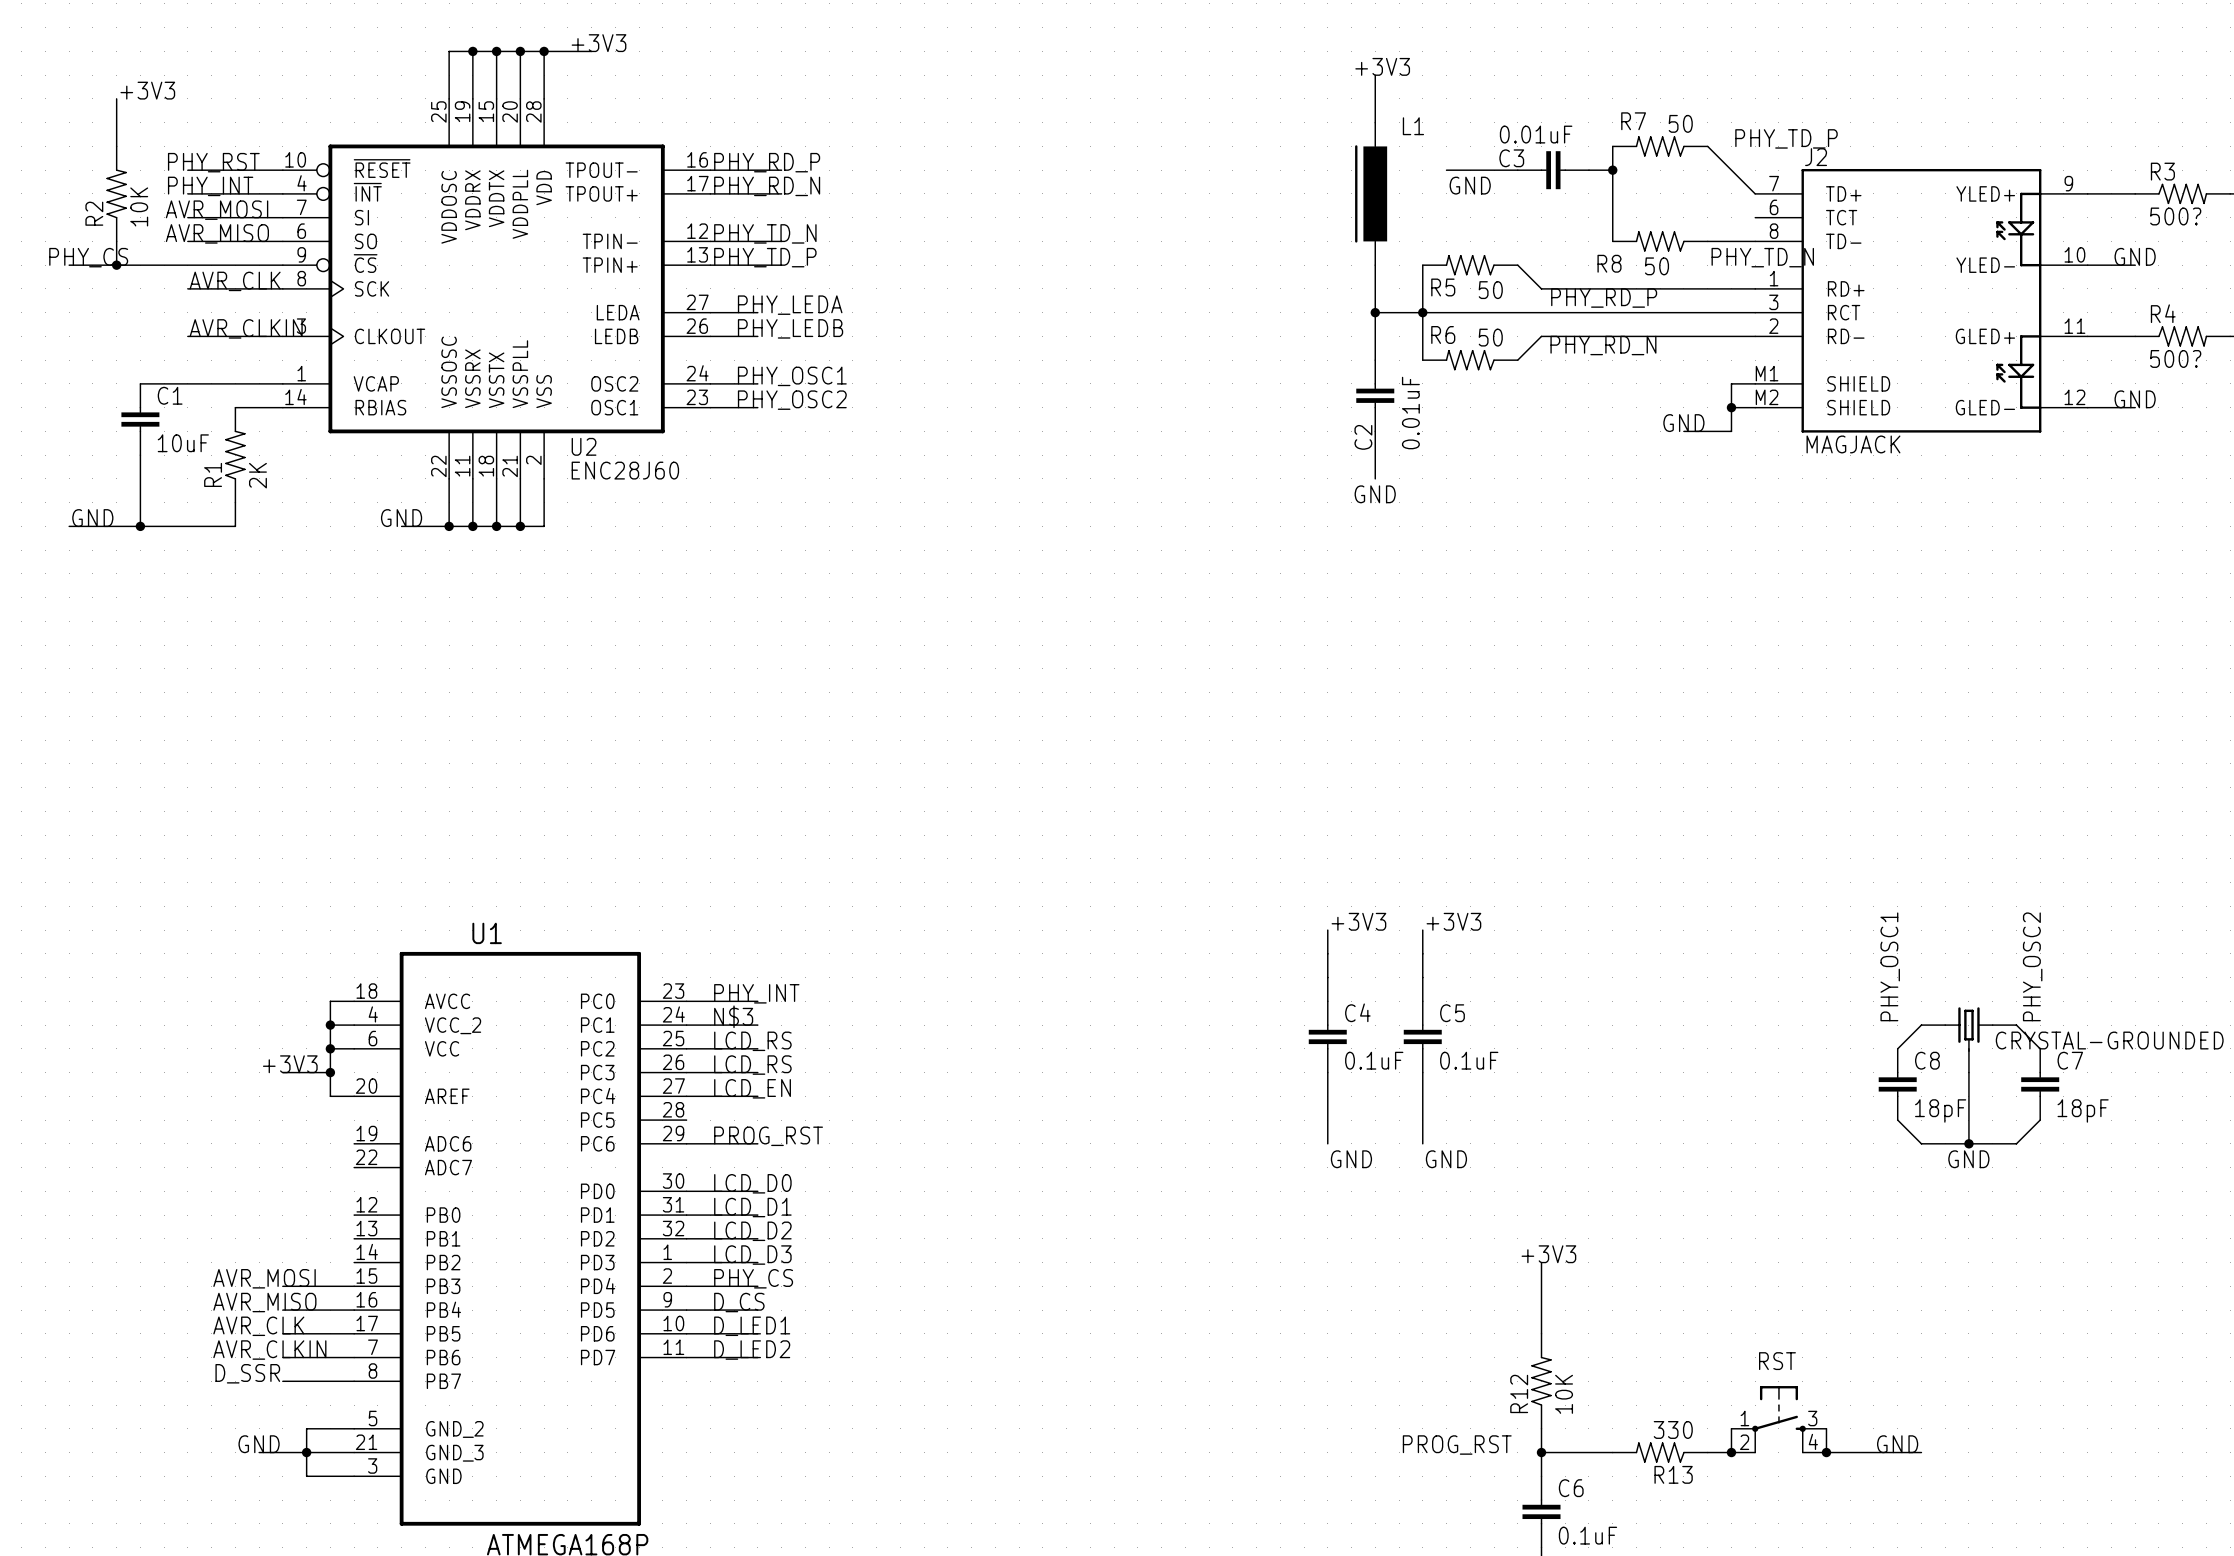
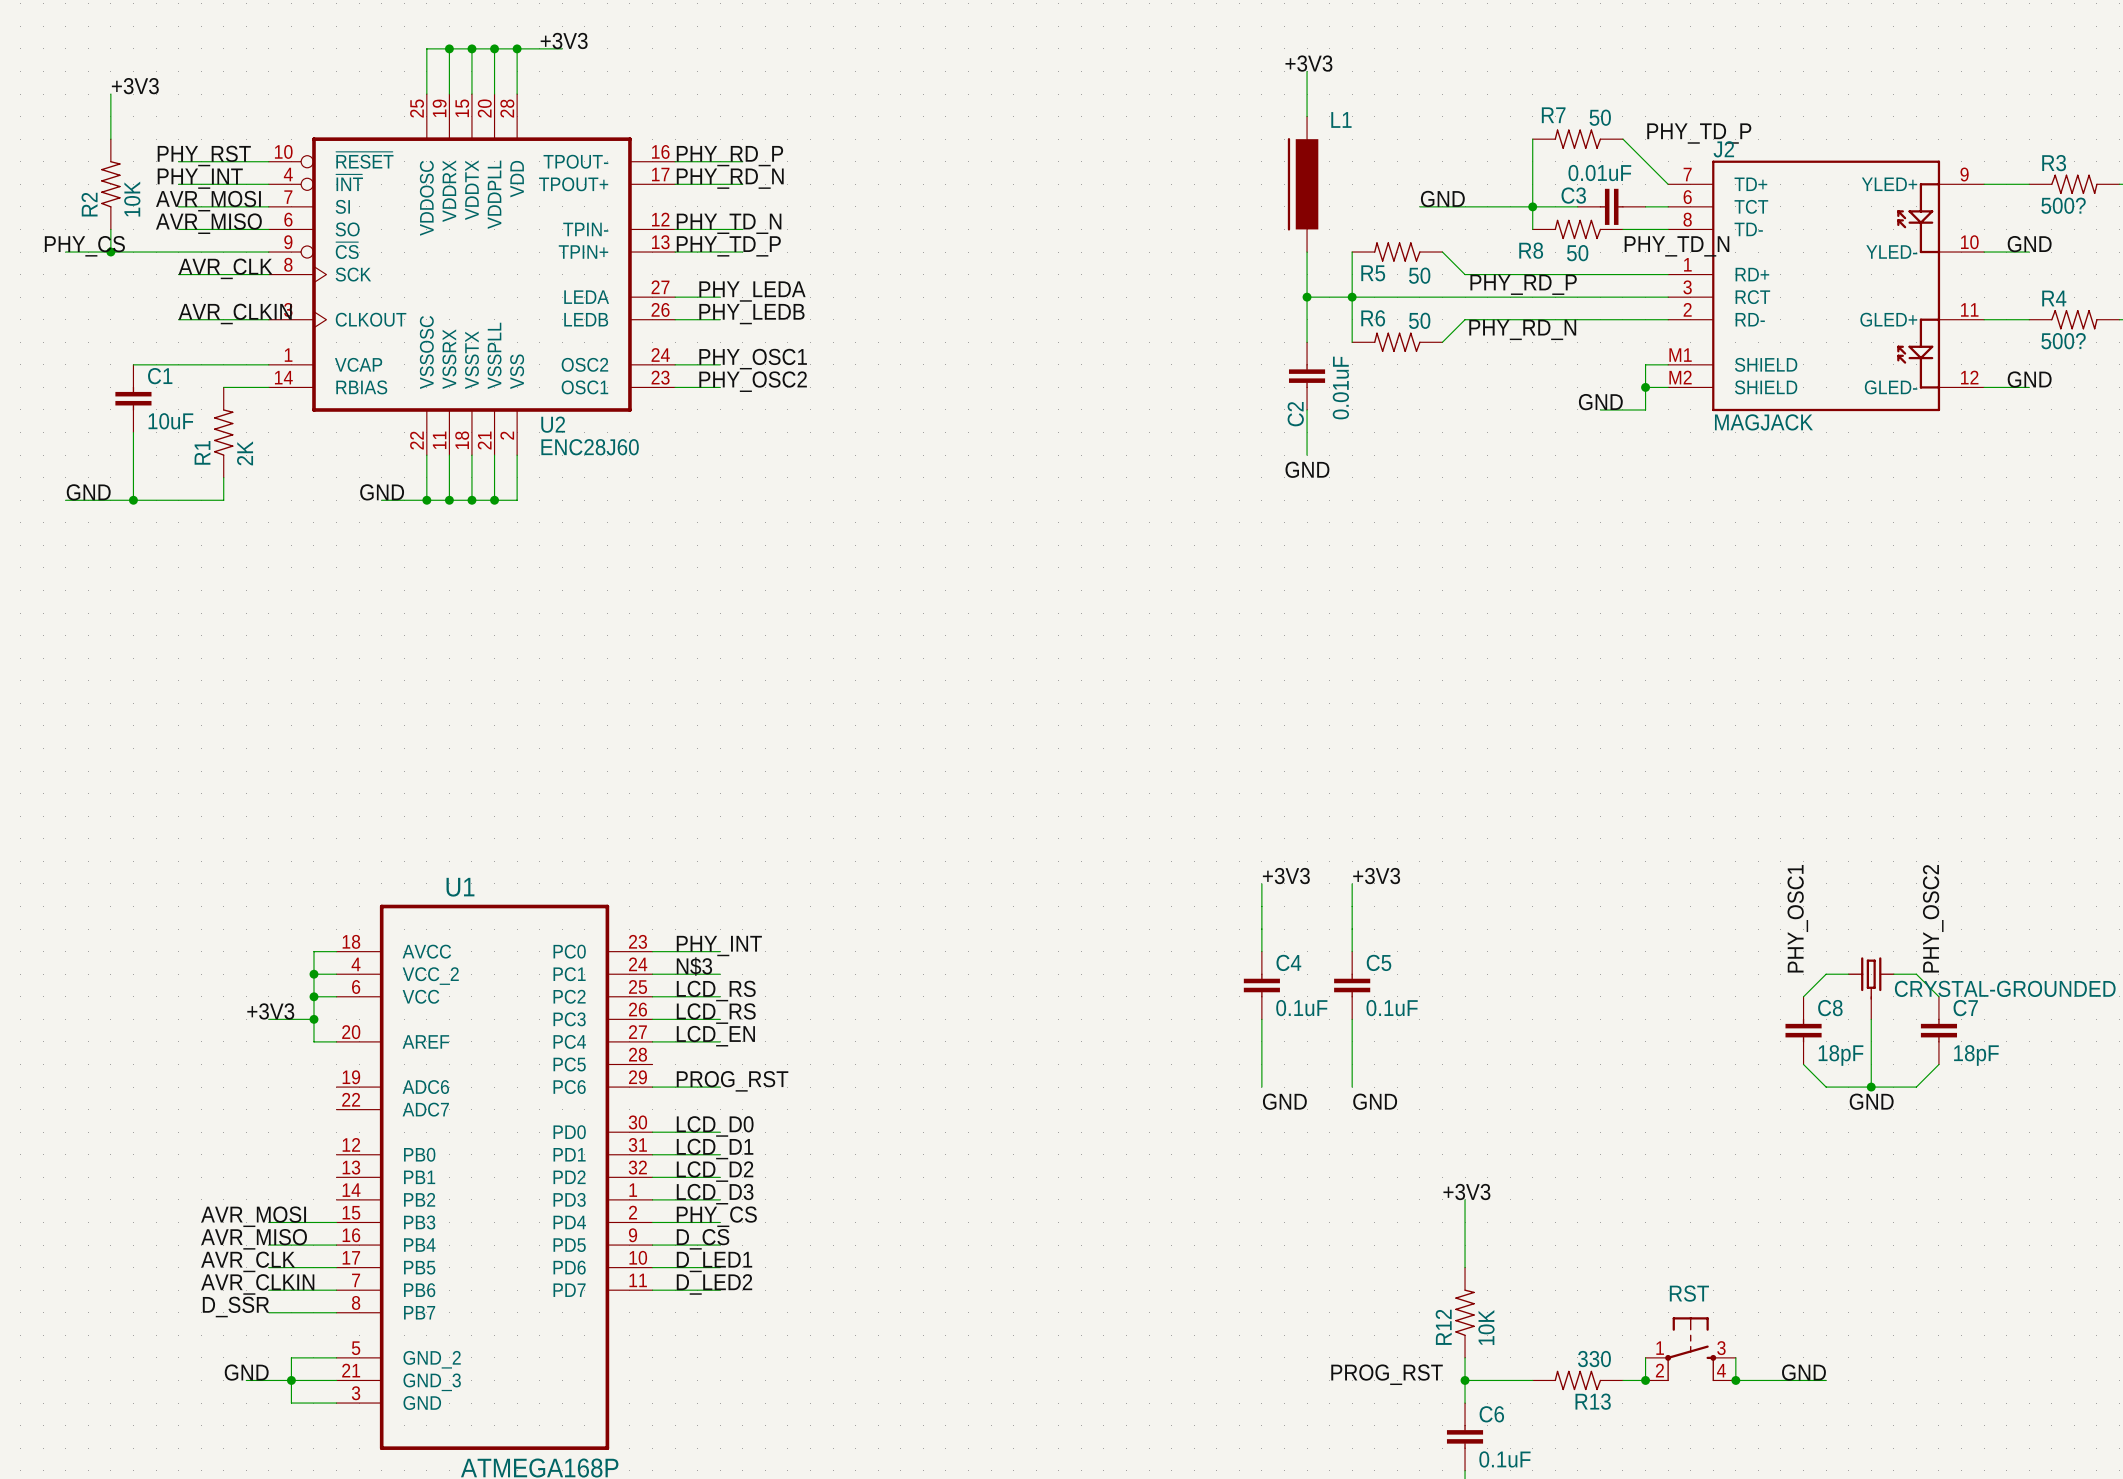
wire: (1446, 170) (1517, 170) -> none
C3 position: (1553, 170) -> (1611, 206)
wire: (1588, 170) (1612, 170) -> (1645, 206) (1668, 206)
junction position: (1612, 170) -> (1532, 206)
label position: GND (1470, 185) -> GND (1442, 198)
wire: none -> (1419, 206) (1577, 206)

